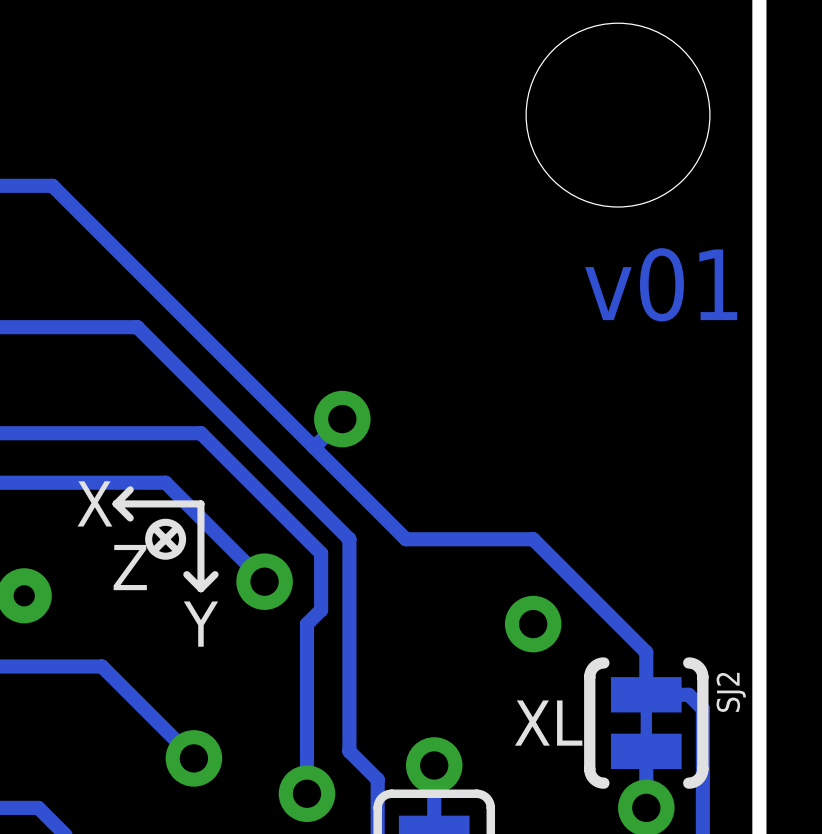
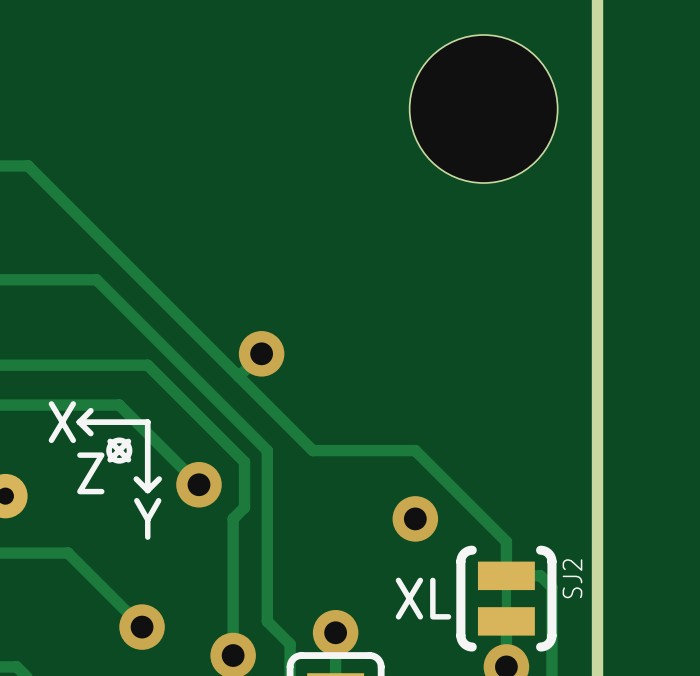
drawing: [585, 248, 738, 322] -> none
drawing: [145, 518, 187, 560] -> none
drawing: none -> [106, 437, 133, 464]

